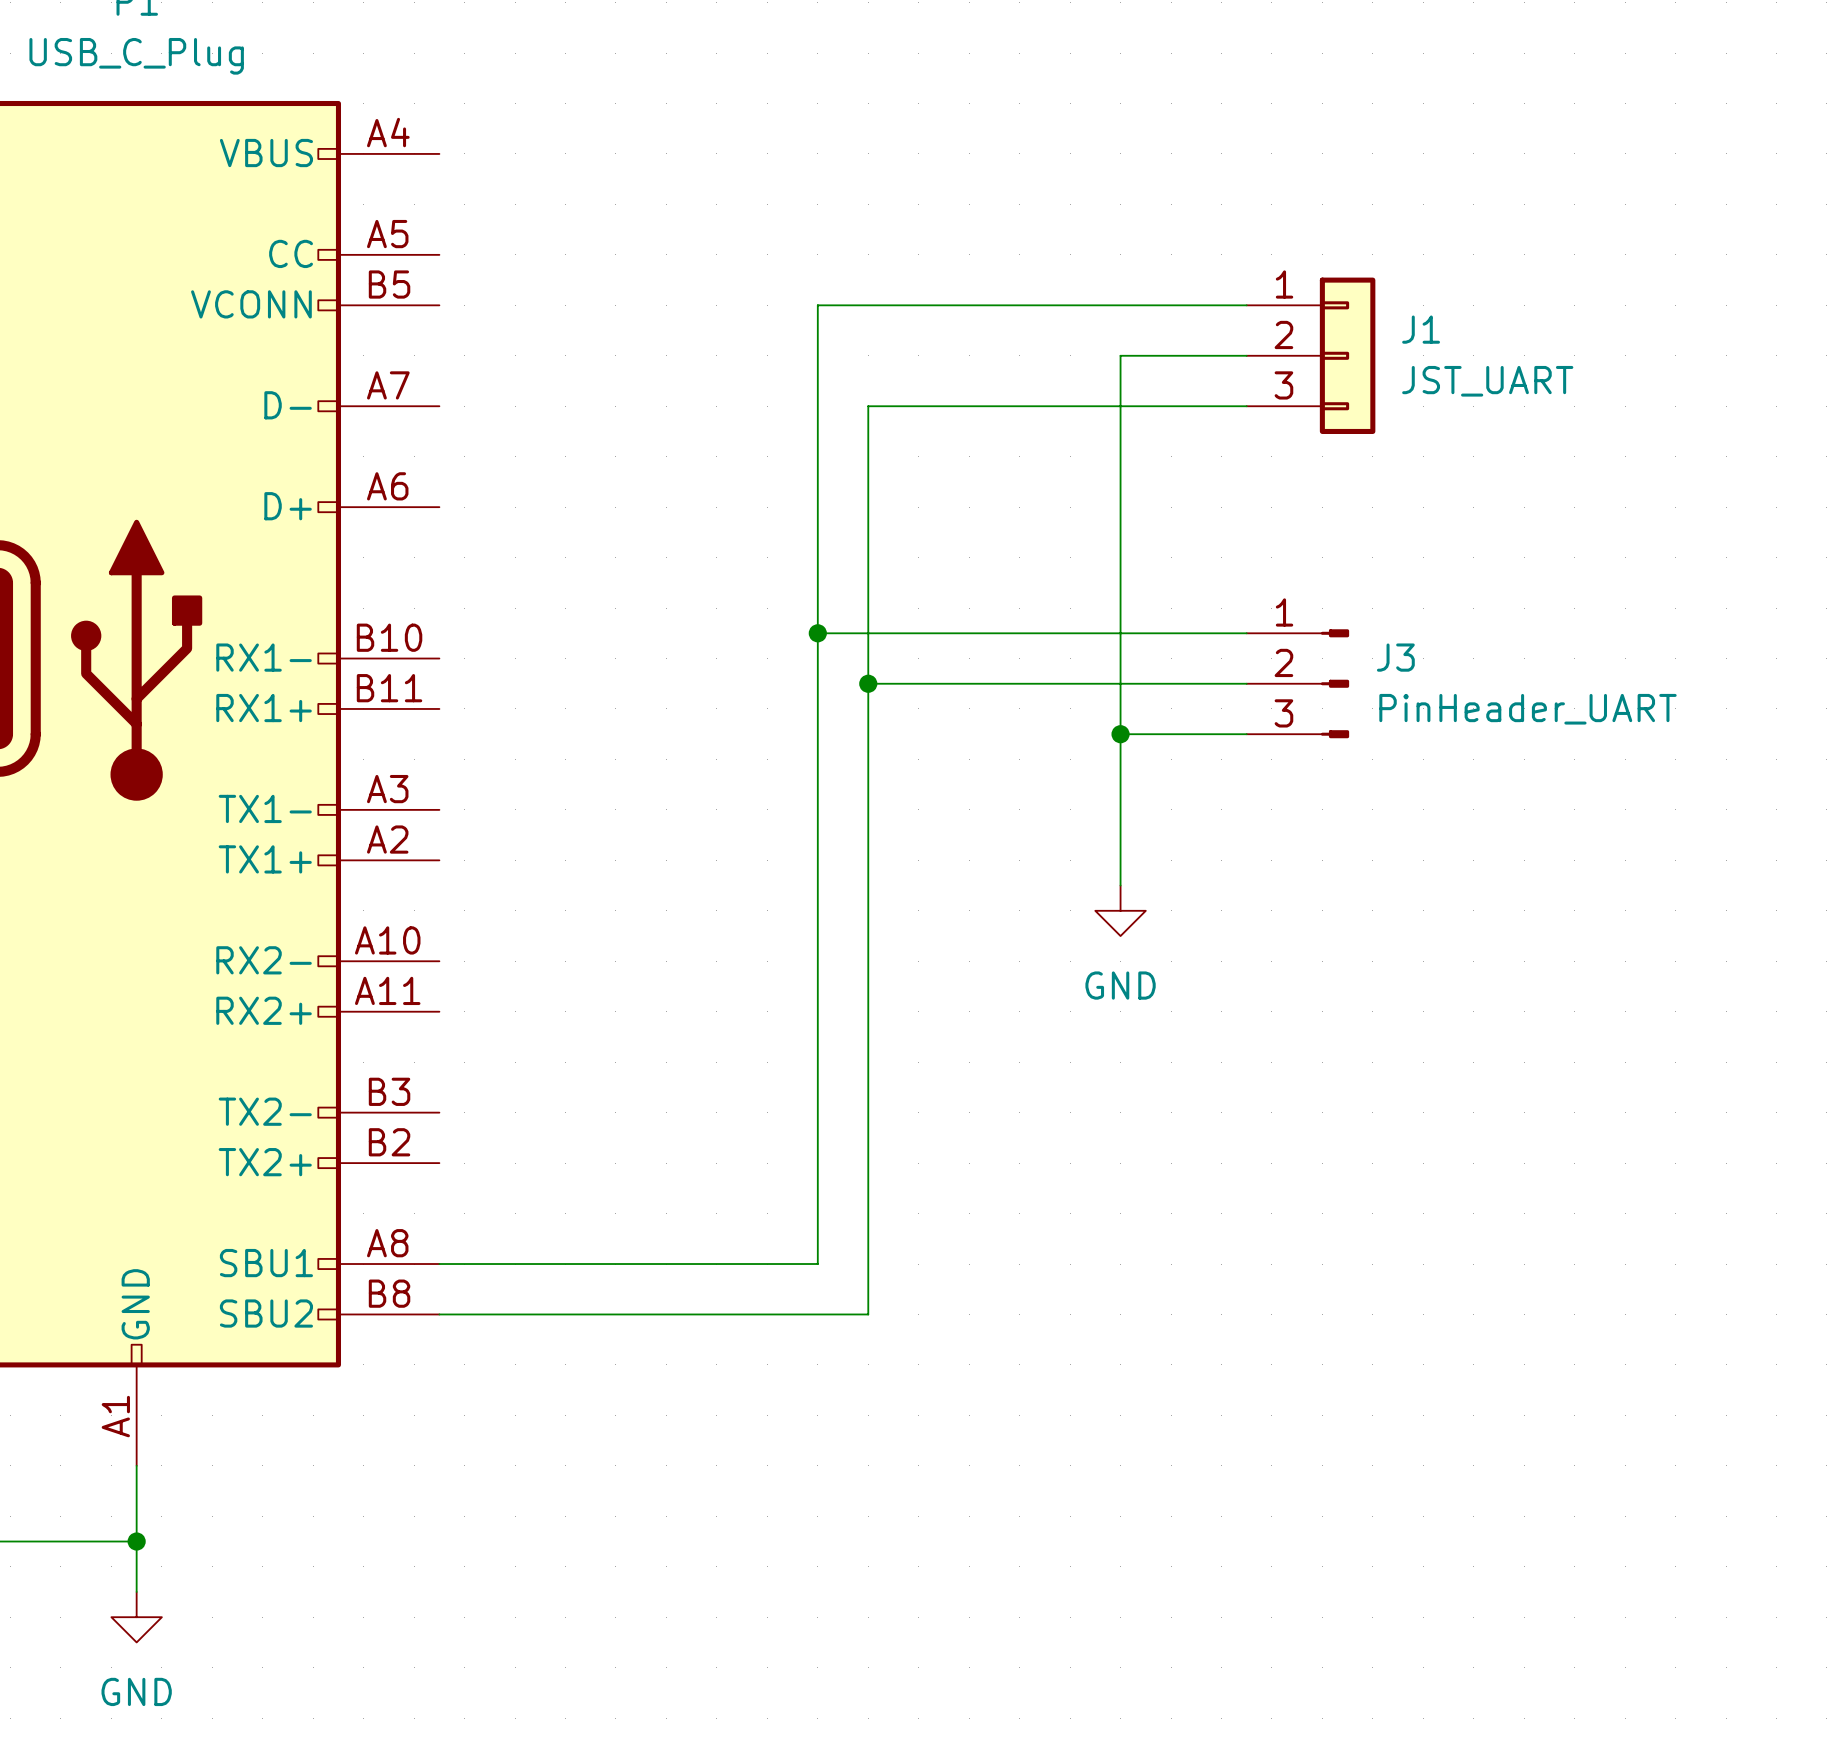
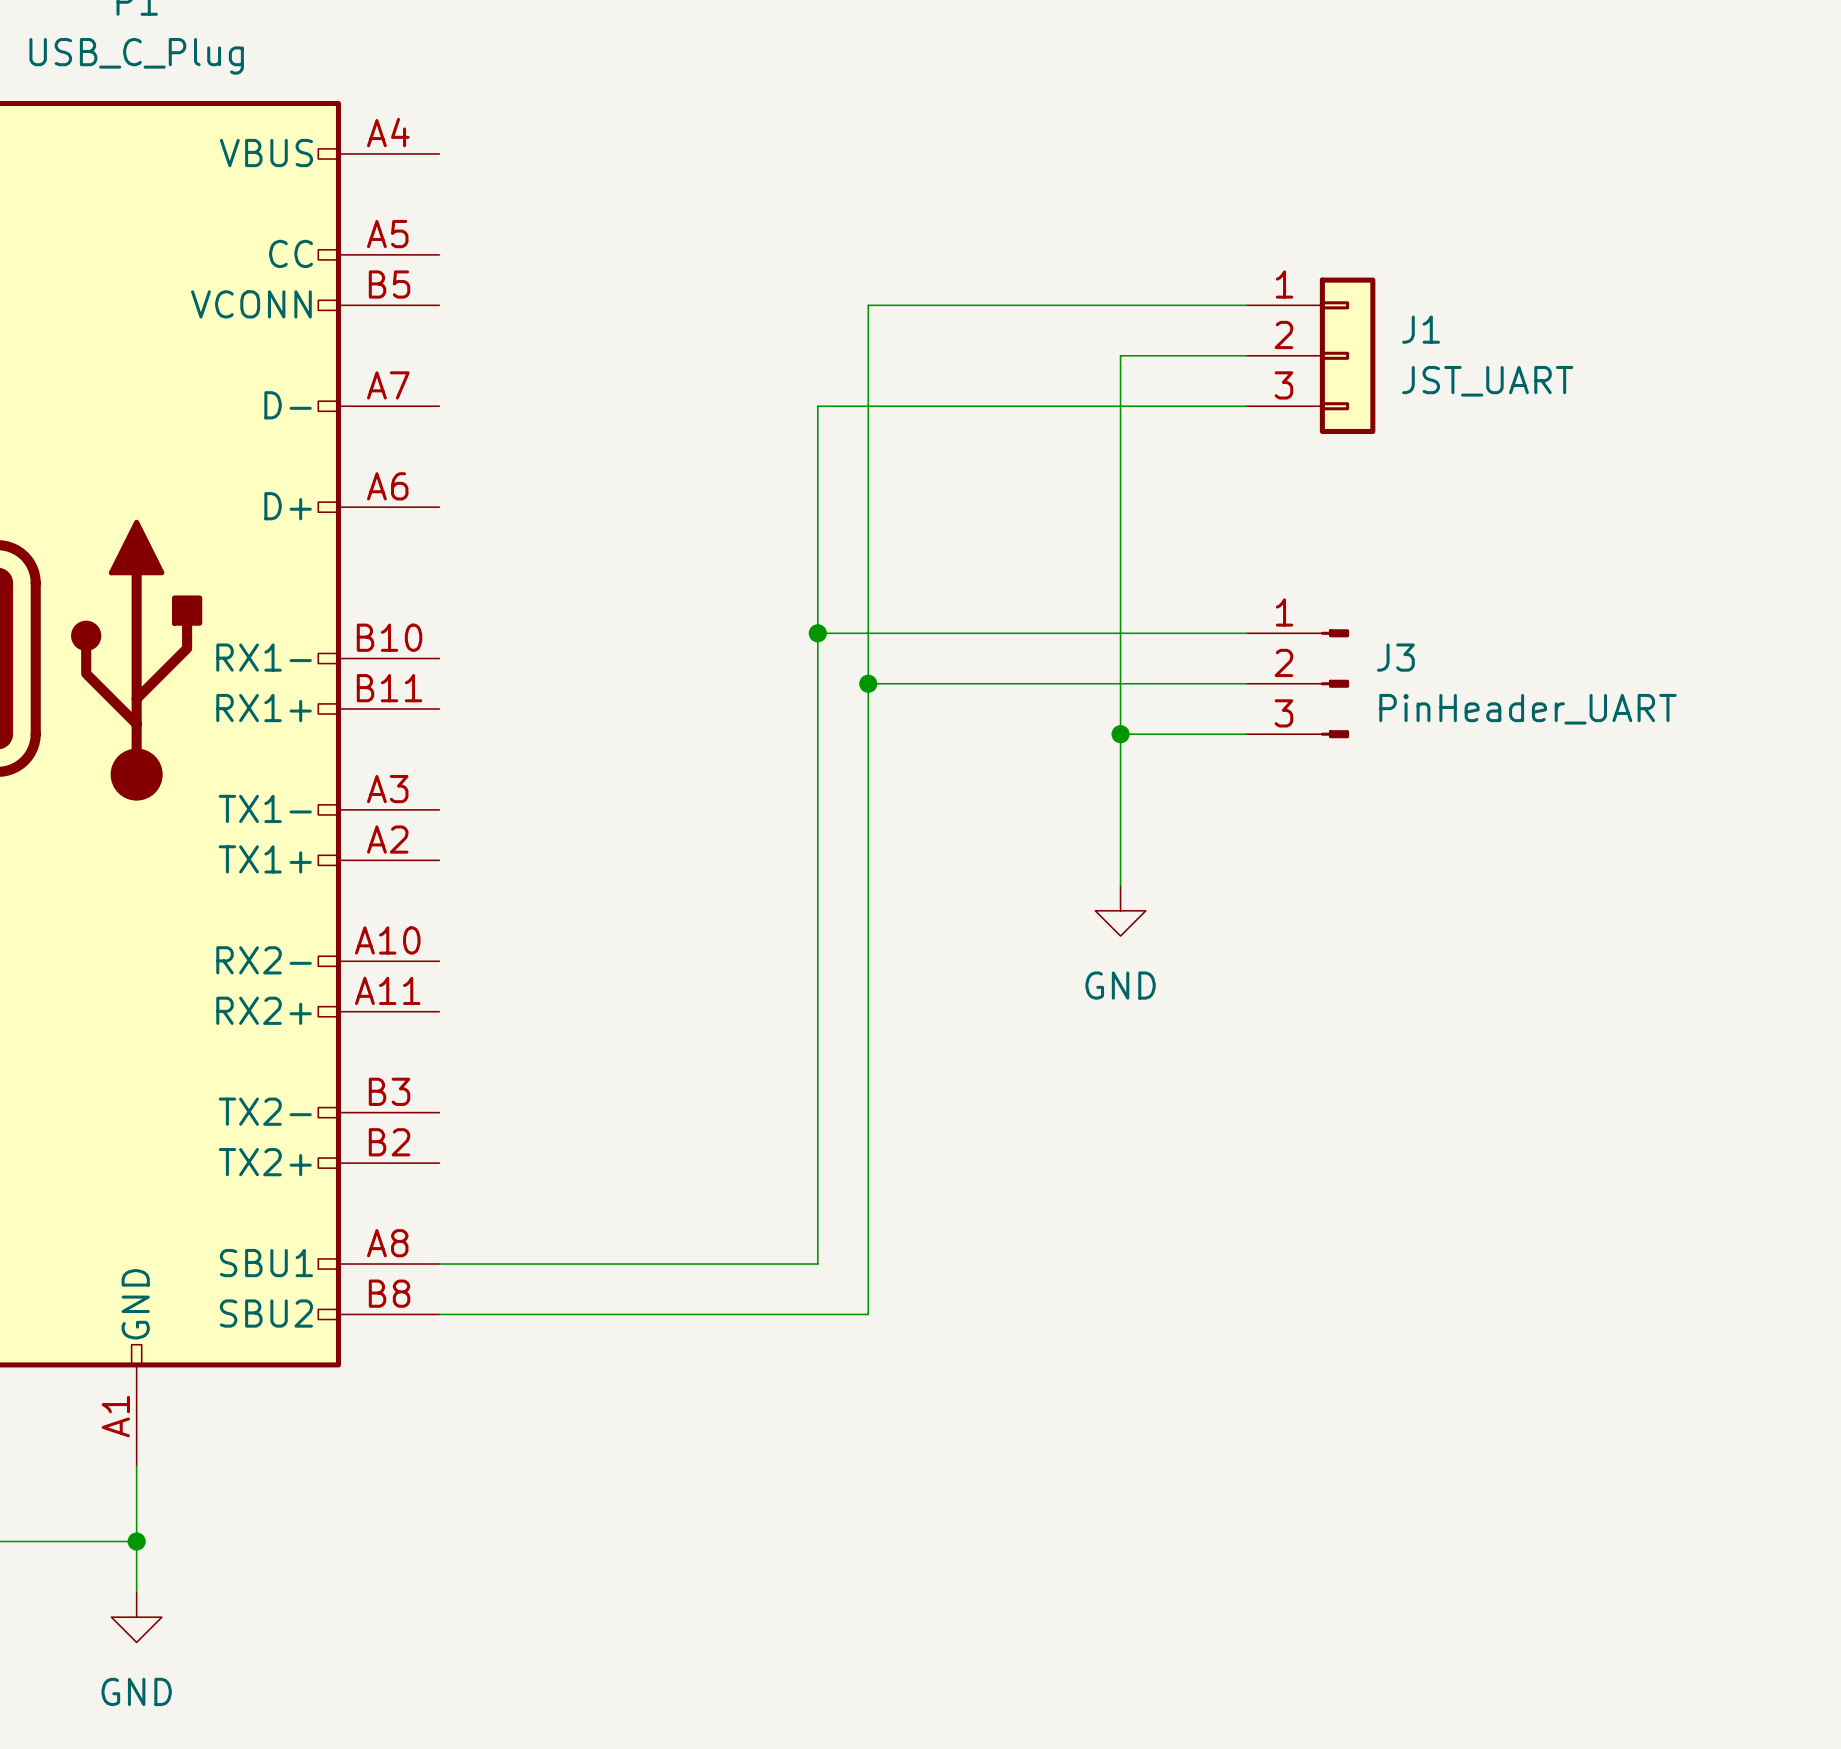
wire: (868, 305) (817, 305) (817, 406) -> (868, 305) (868, 406) (817, 406)

